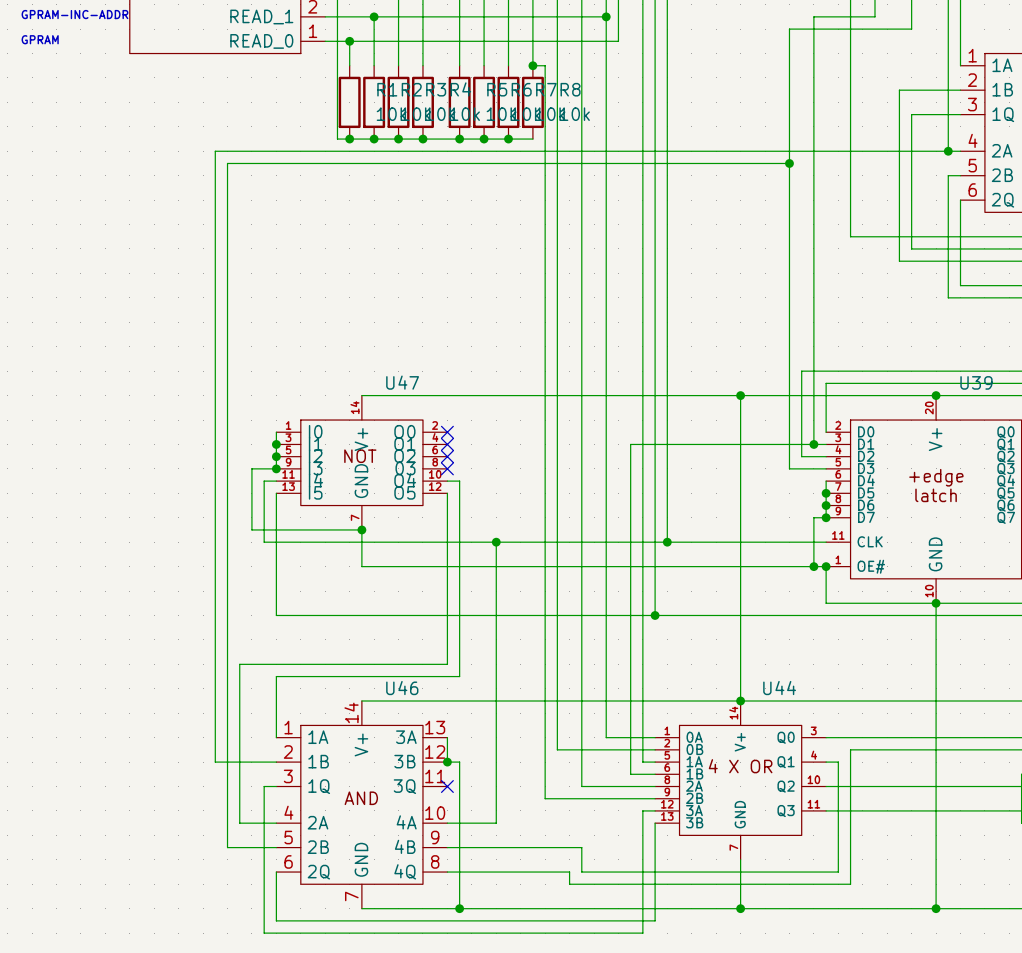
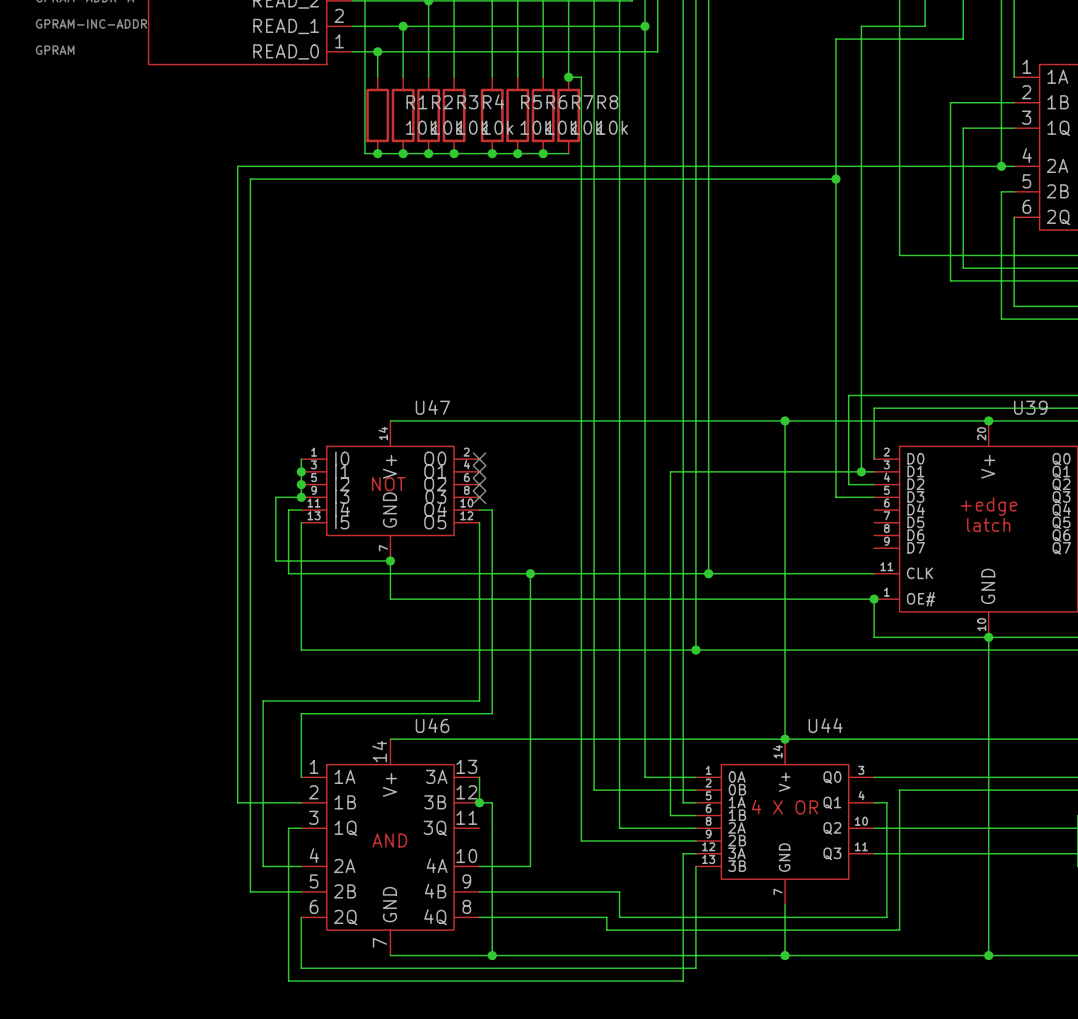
wire: (826, 481) (826, 517) (813, 517) (813, 566) -> none
junction: (826, 493) -> none
junction: (826, 505) -> none
junction: (826, 517) -> none
junction: (813, 566) -> none
no-connect mark: (447, 786) -> none

